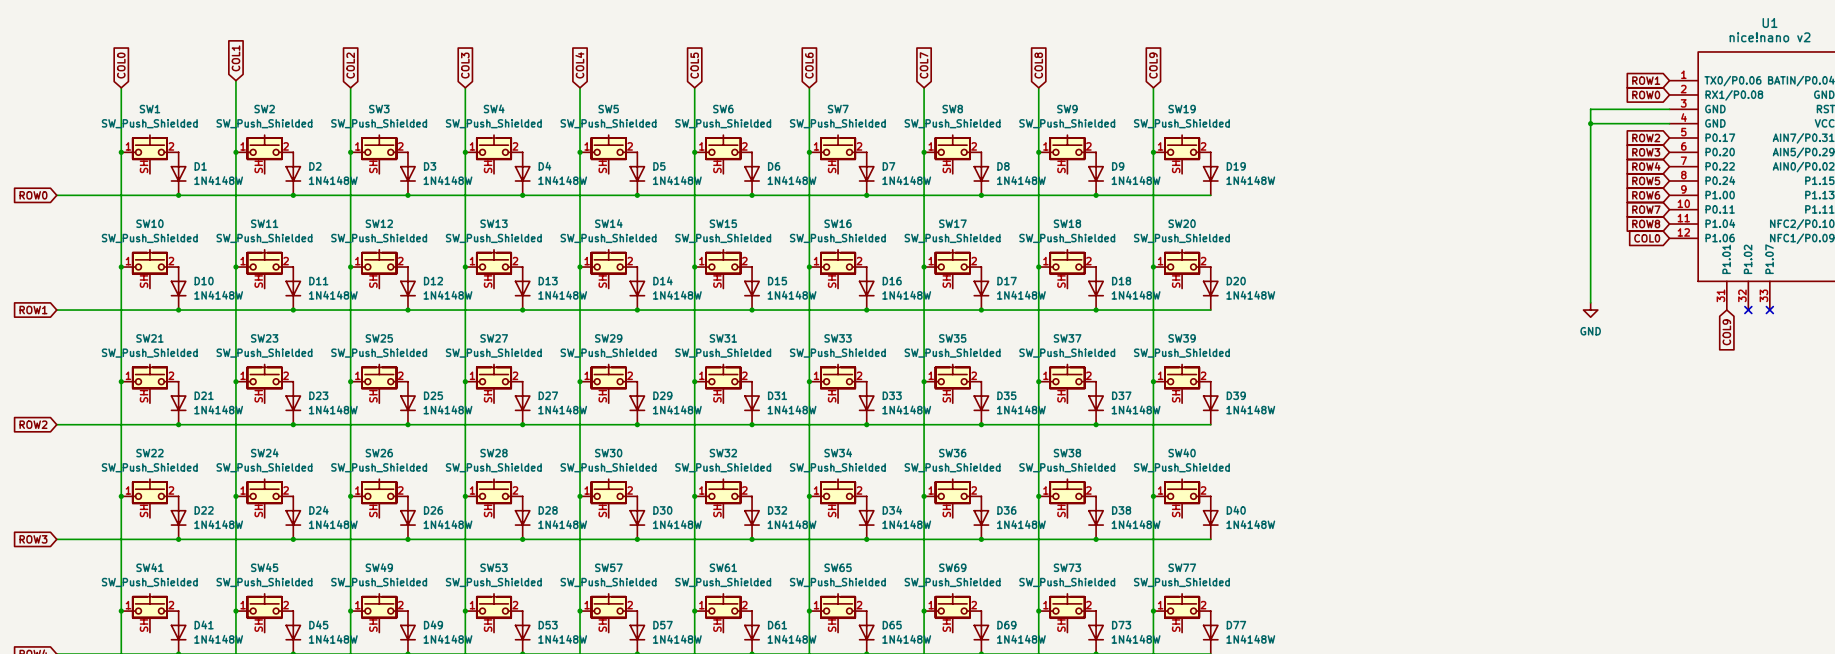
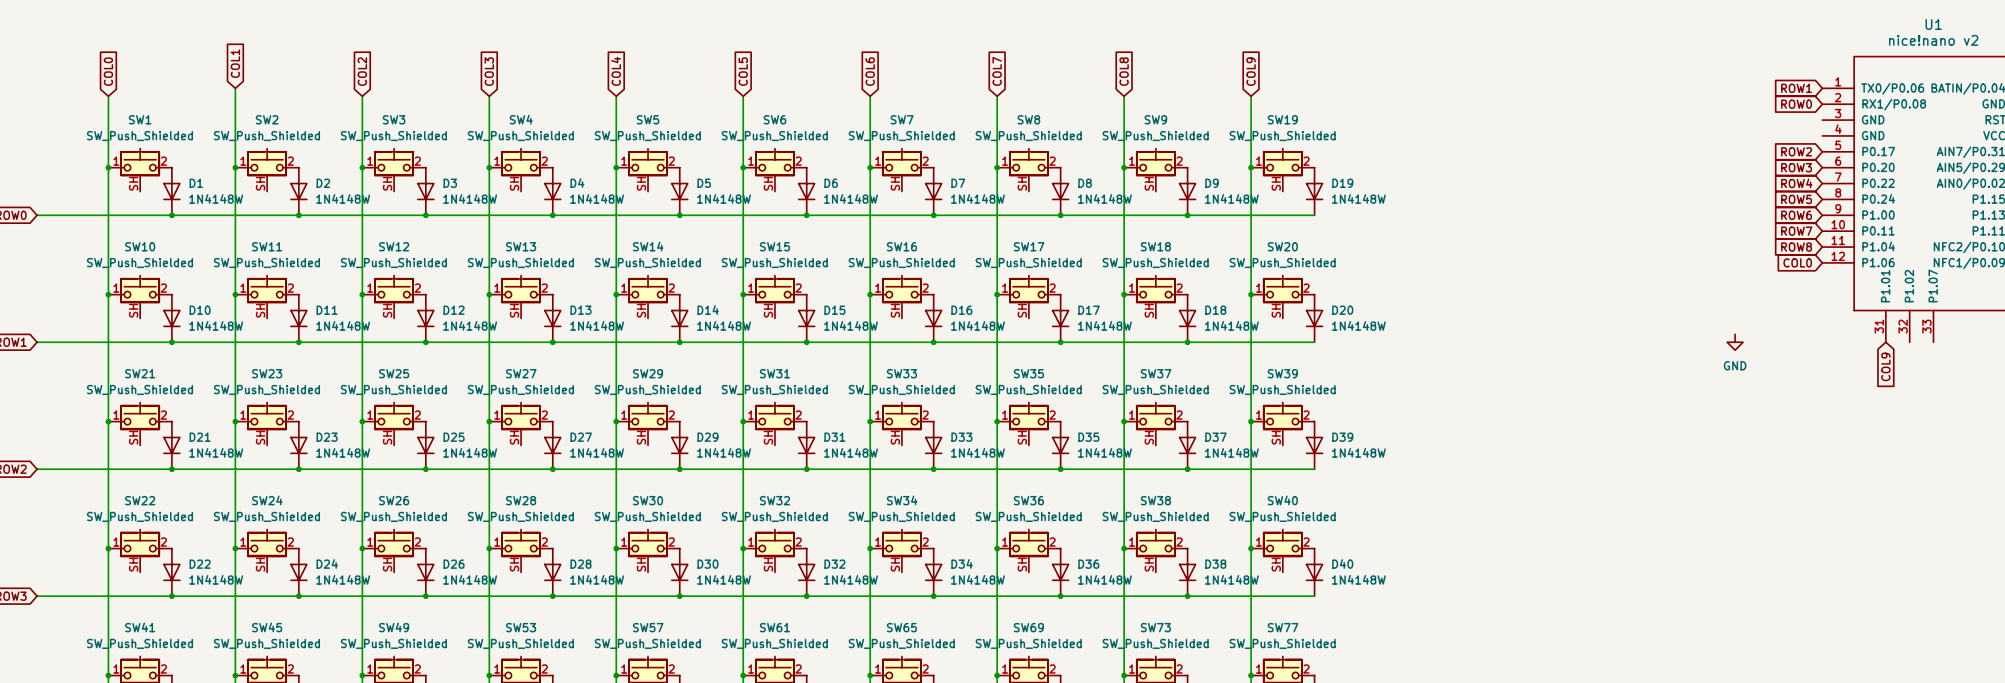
wire: (1669, 109) (1590, 109) (1590, 302) -> none
wire: (1590, 123) (1669, 123) -> none
junction: (1590, 123) -> none
no-connect mark: (1748, 310) -> none
no-connect mark: (1769, 310) -> none

